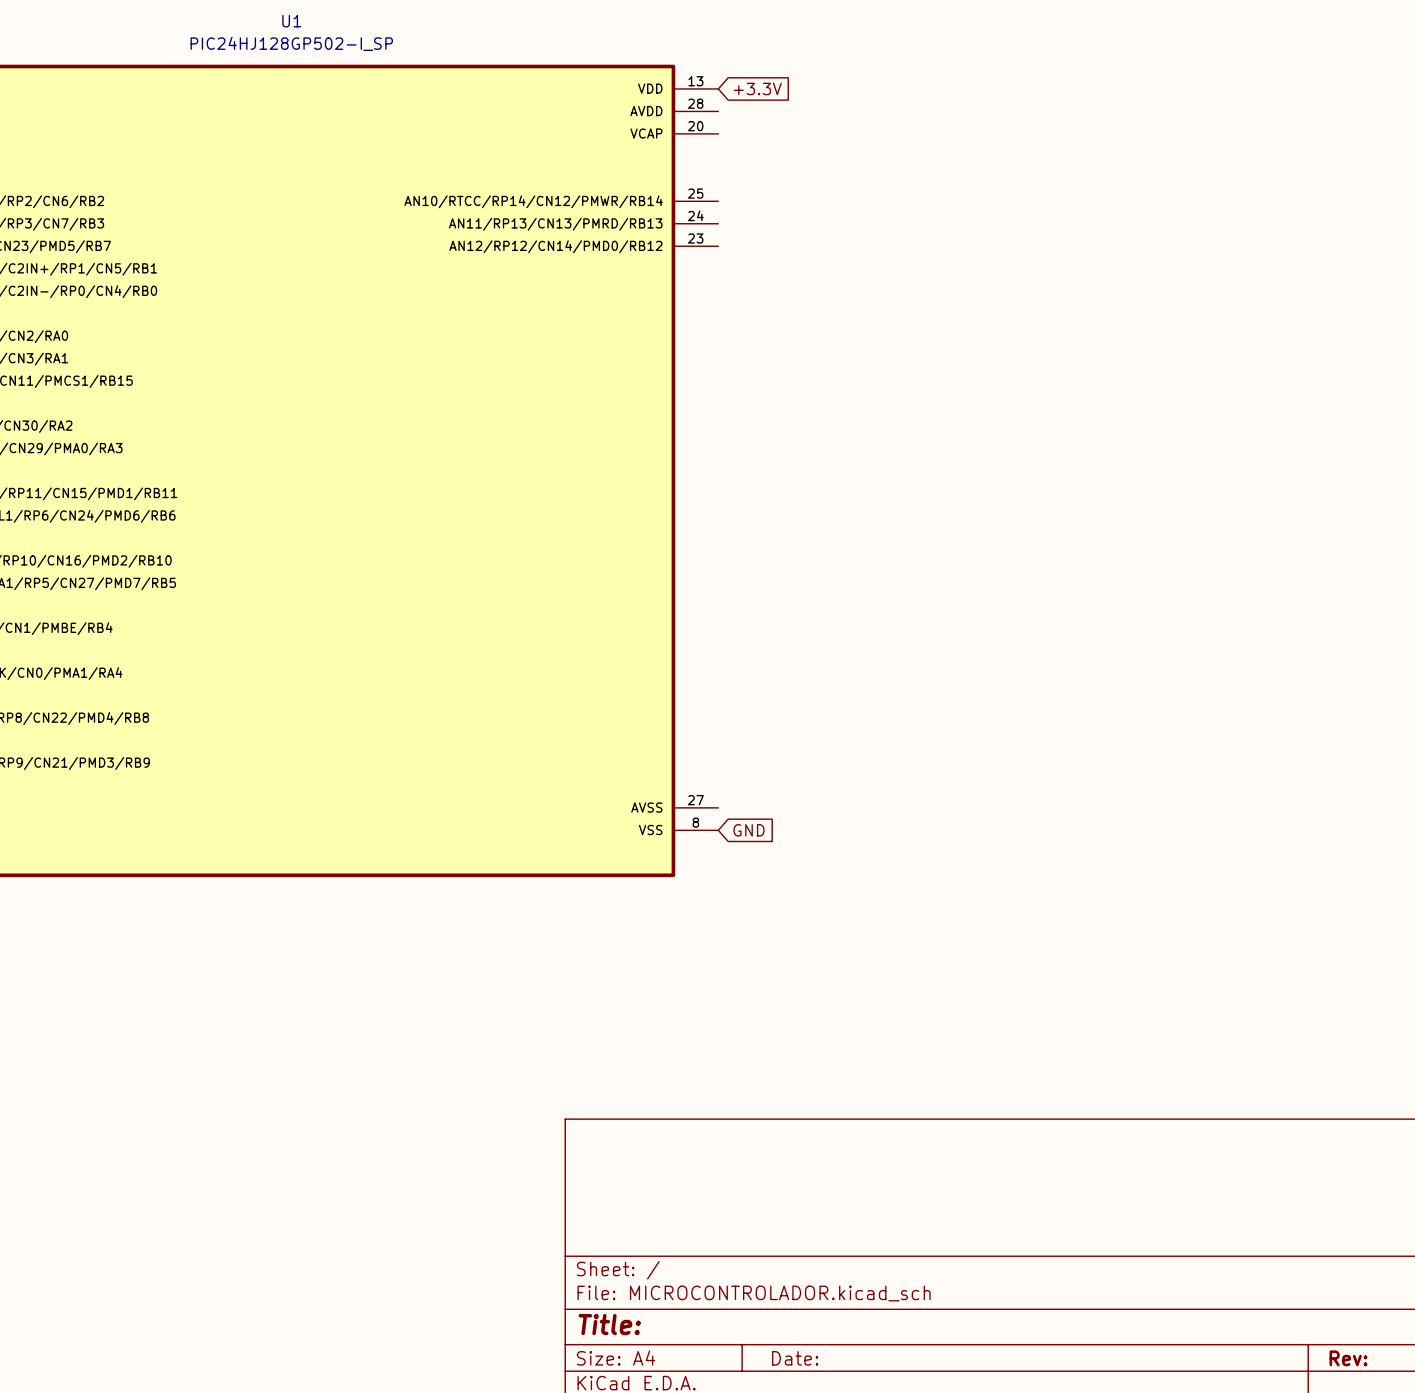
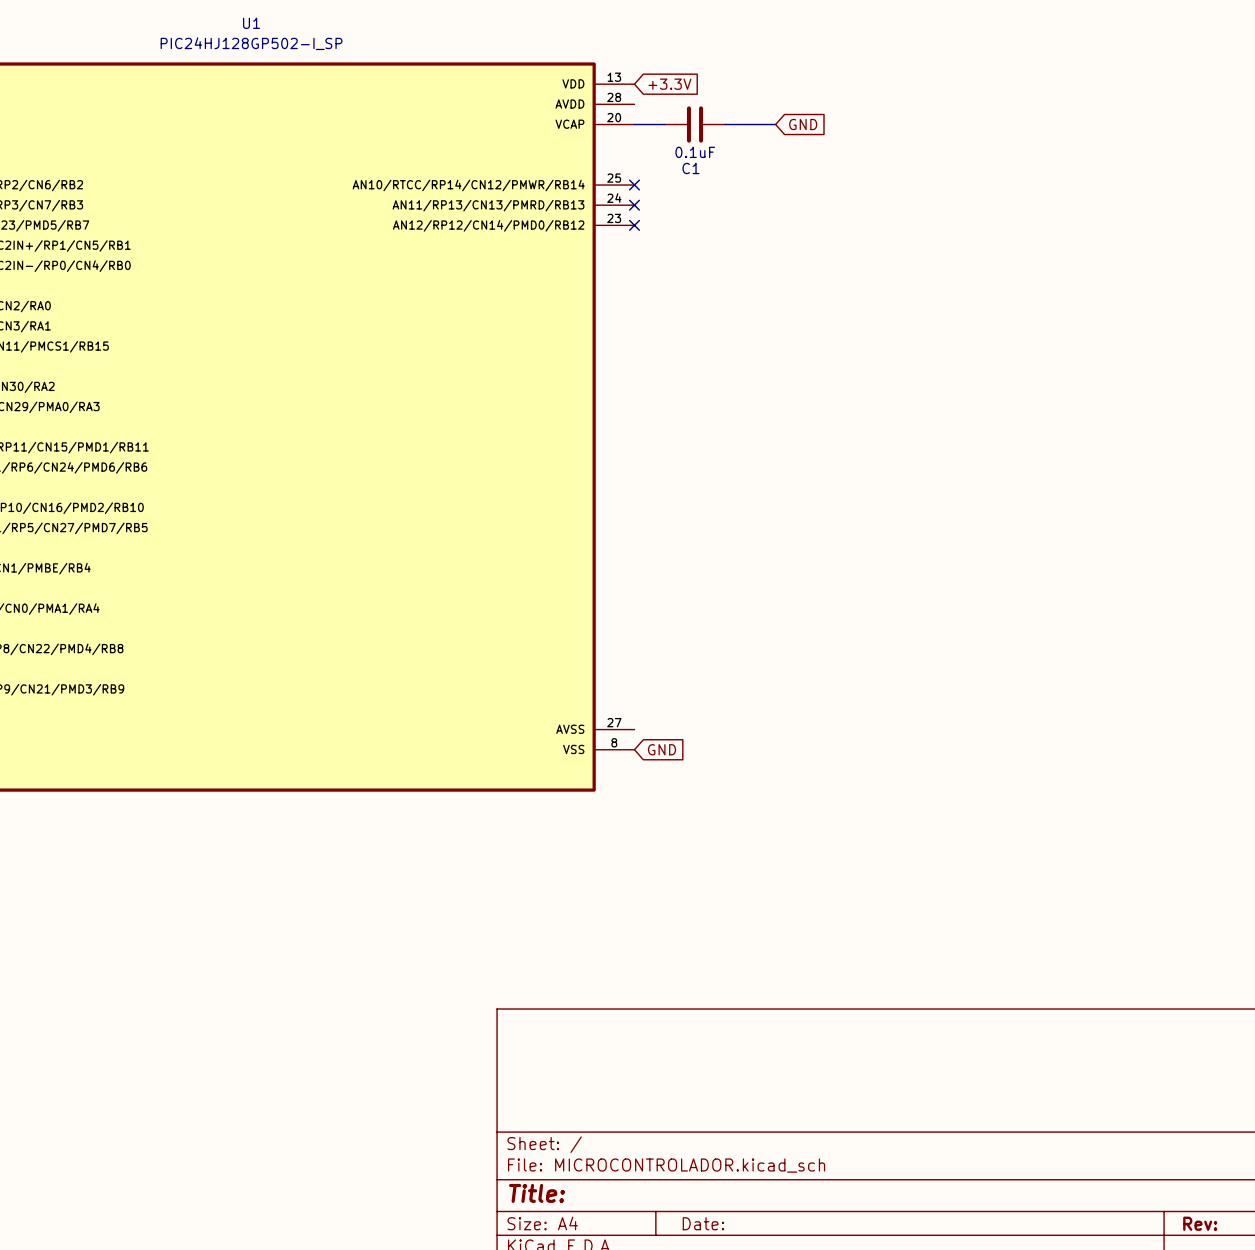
wire: none -> (634, 124) (664, 124)
C1: none -> 0.1uF (695, 124)
wire: none -> (725, 124) (775, 124)
global label: none -> GND (803, 124)
no-connect mark: none -> (634, 185)
no-connect mark: none -> (634, 205)
no-connect mark: none -> (634, 225)

